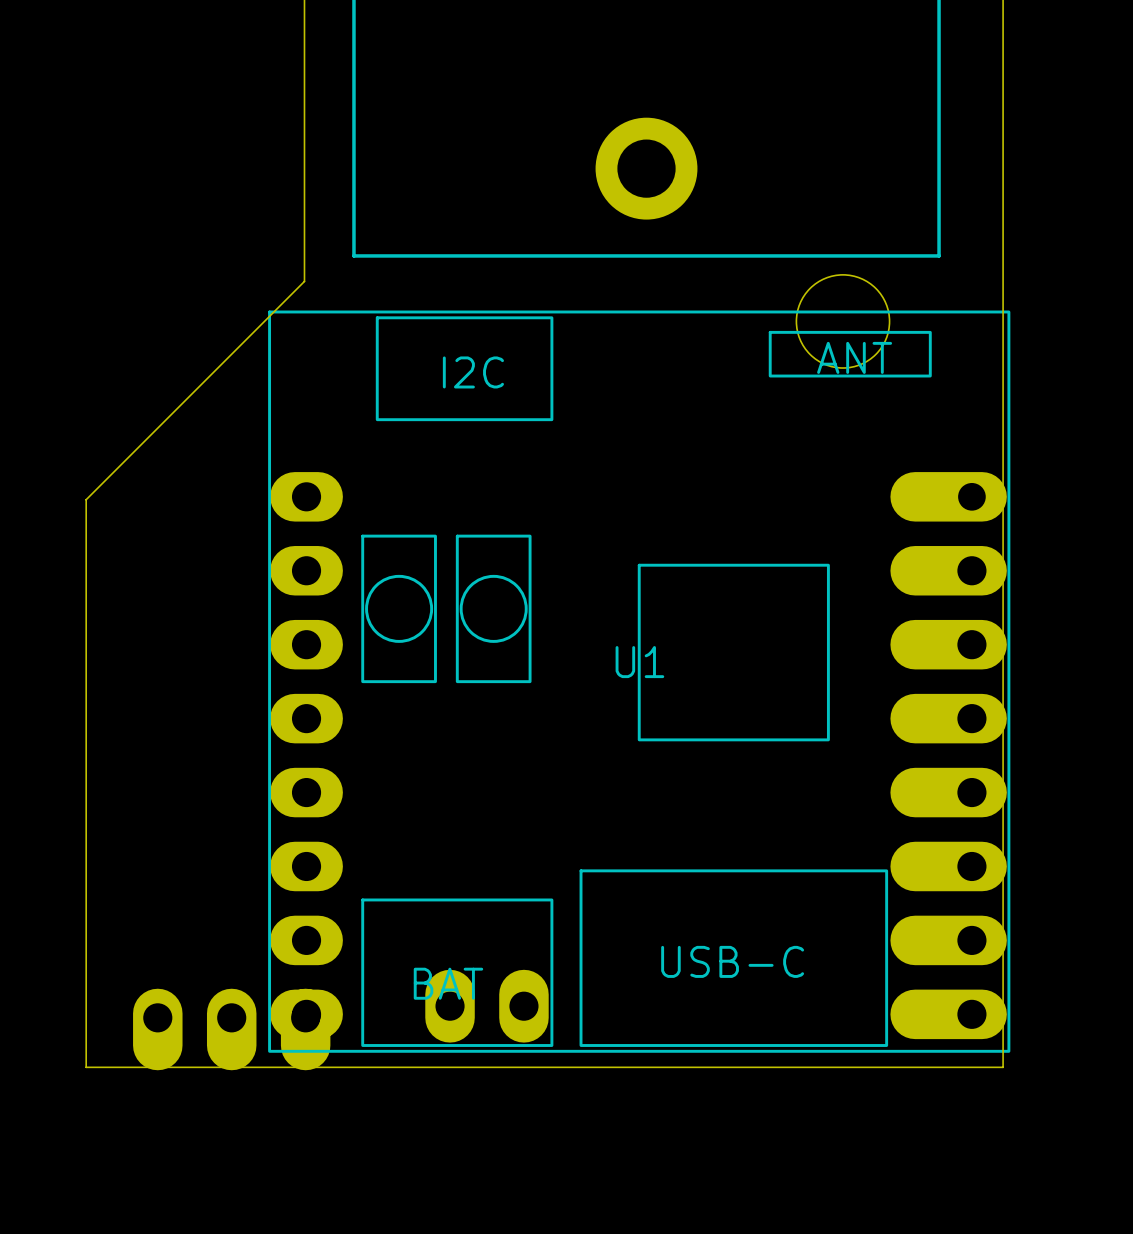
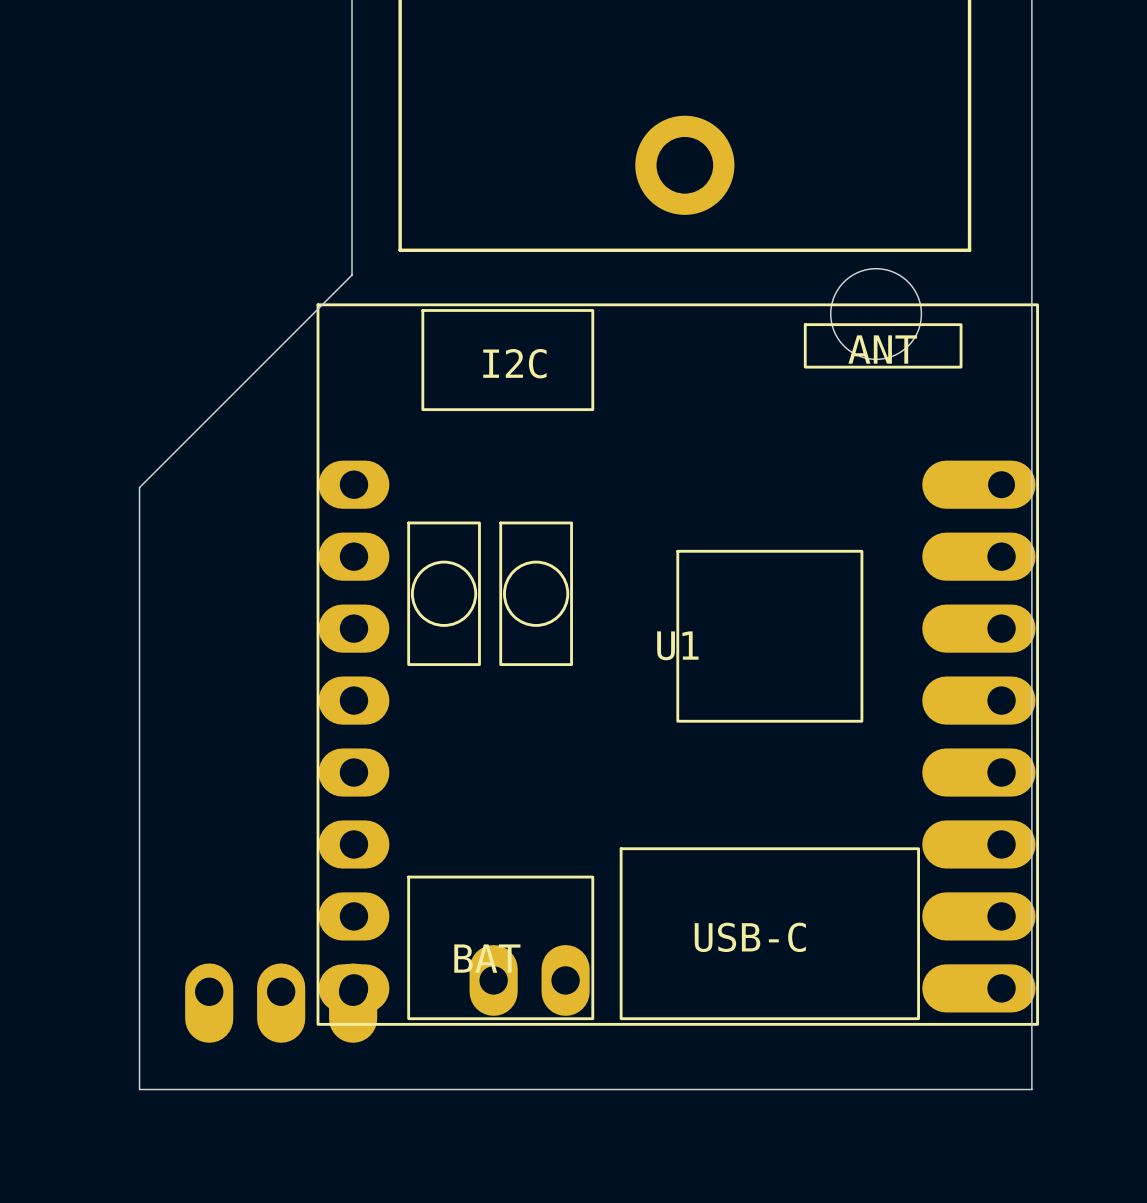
board edge: (86, 1067) (1003, 1067) -> (139, 1039) (139, 1089) (1031, 1089) (1031, 1039)

